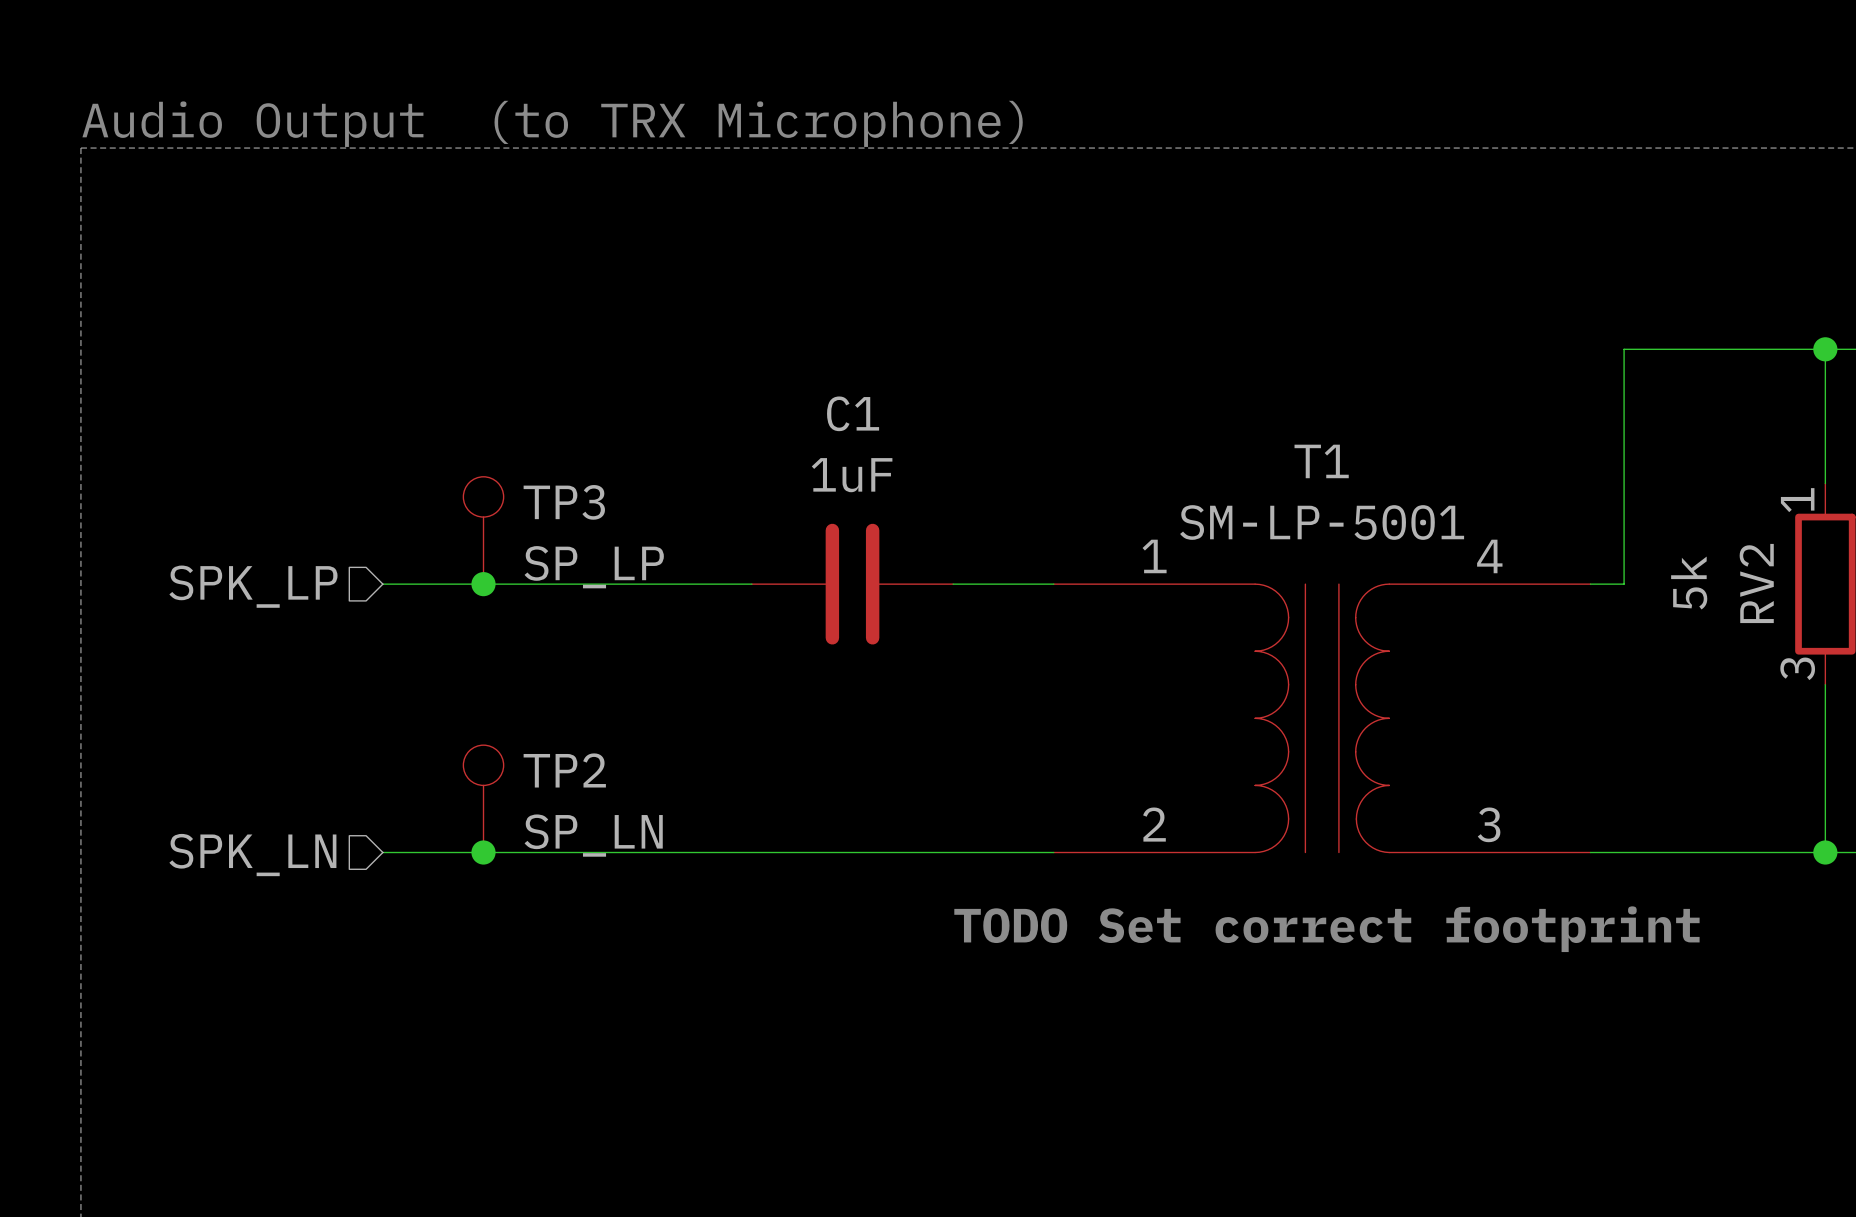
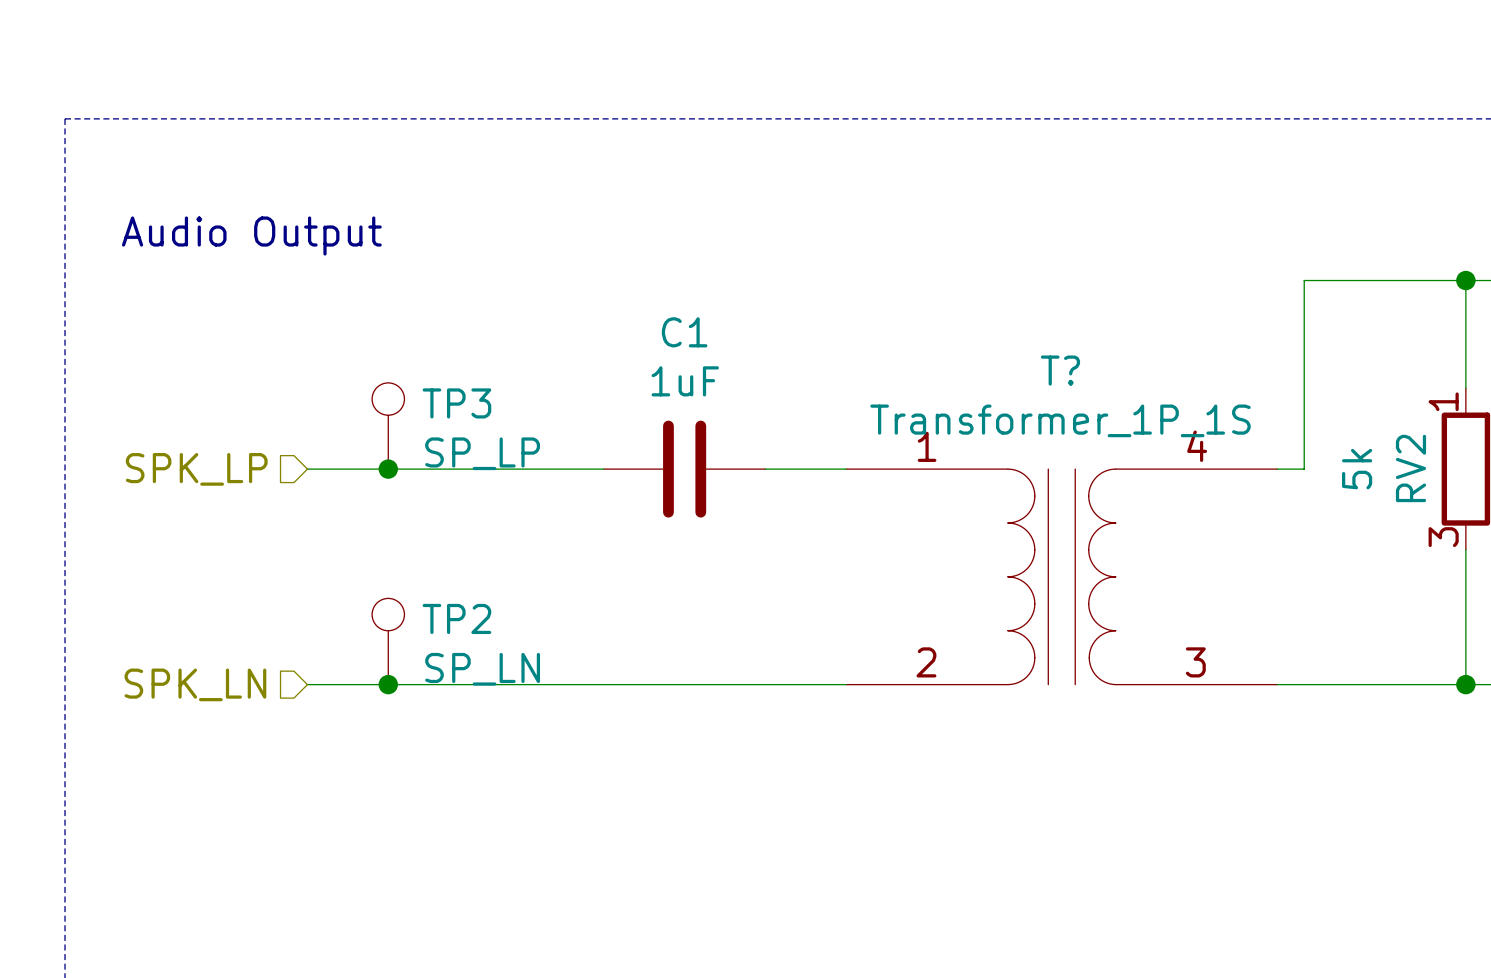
text: Audio Output (to TRX Microphone) (552, 123) -> none
text: none -> Audio Output (251, 236)
T1 name: T1 (1321, 461) -> T? (1060, 370)
T1 value: SM-LP-5001 (1322, 522) -> Transformer_1P_1S (1060, 420)
text: TODO Set correct footprint (1326, 929) -> none

